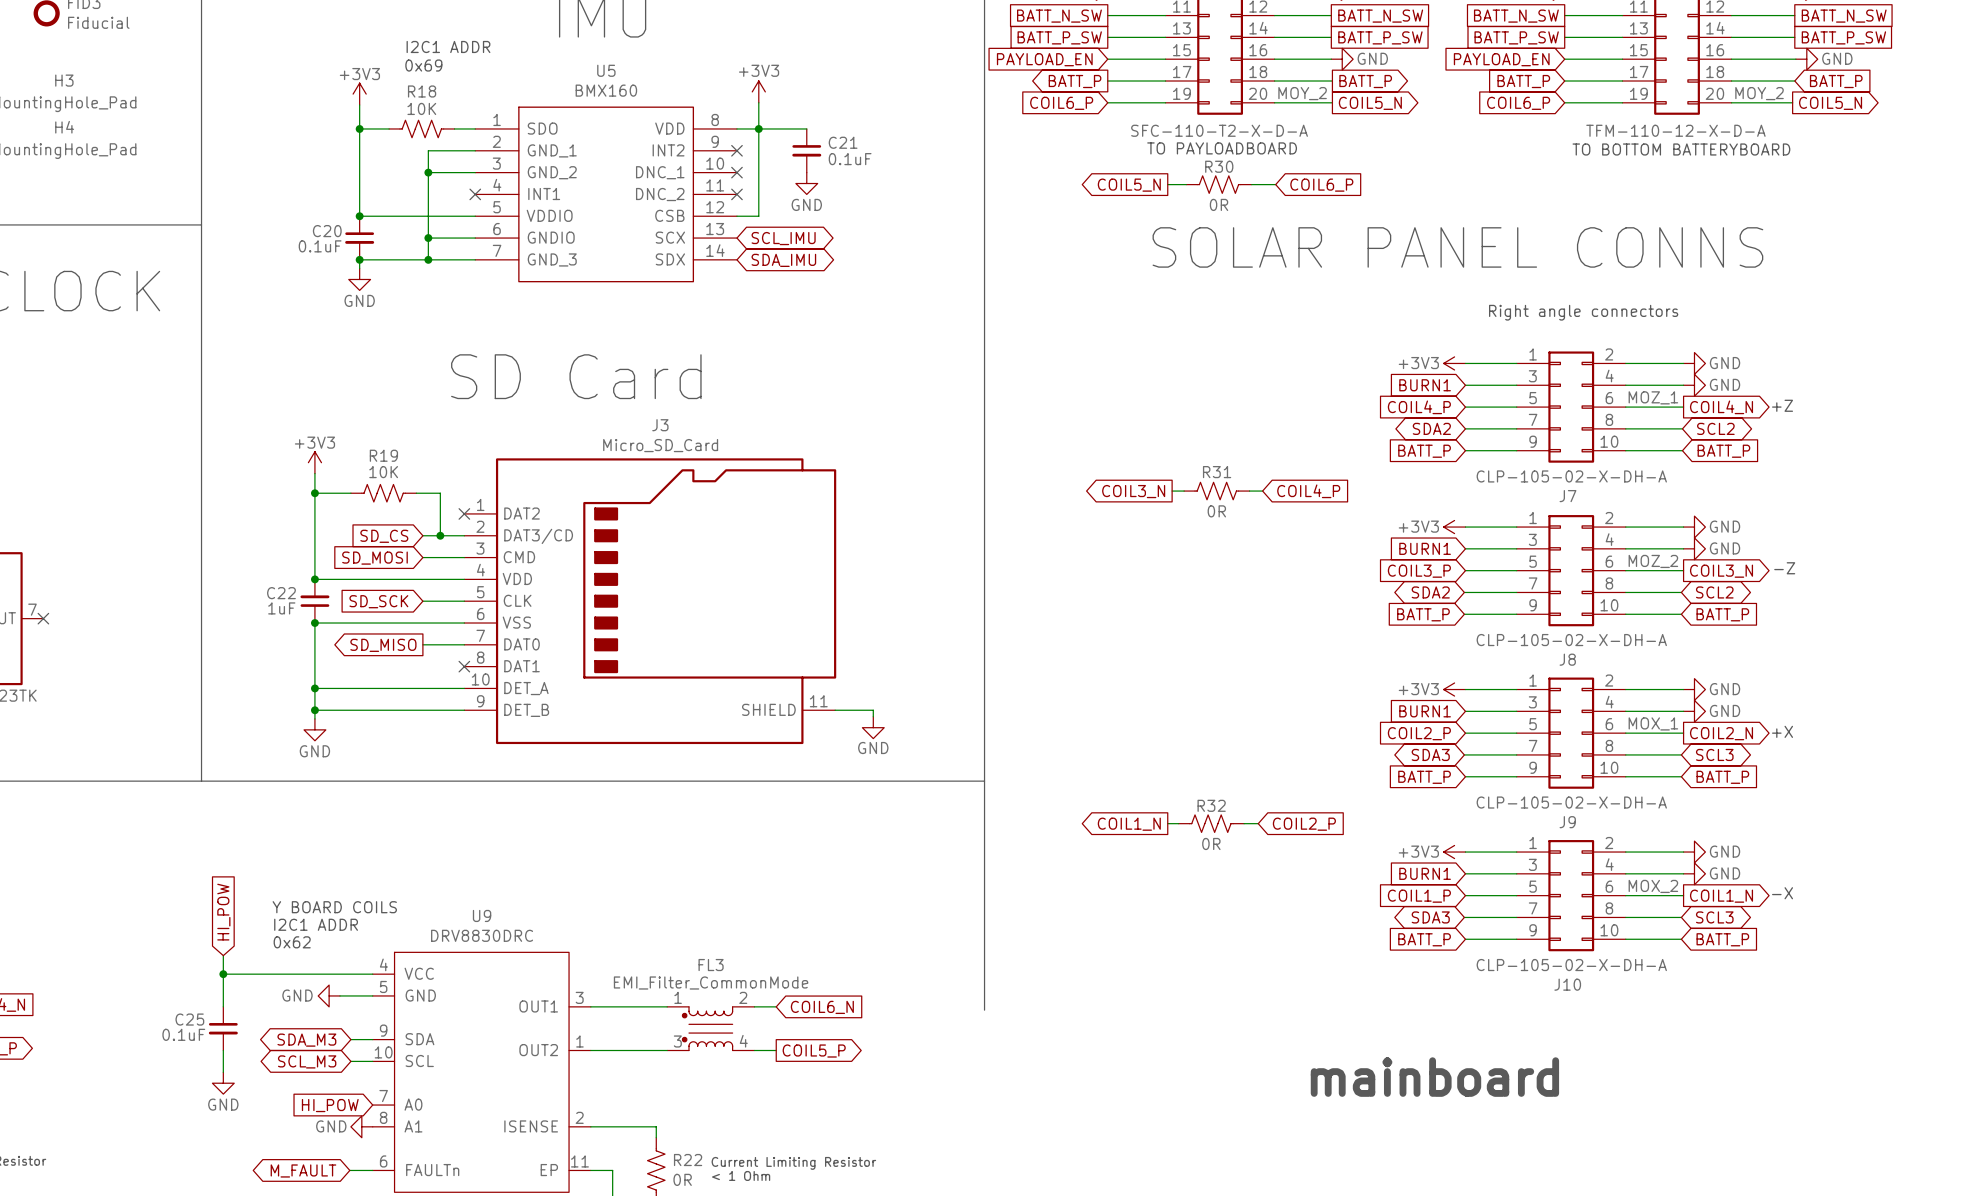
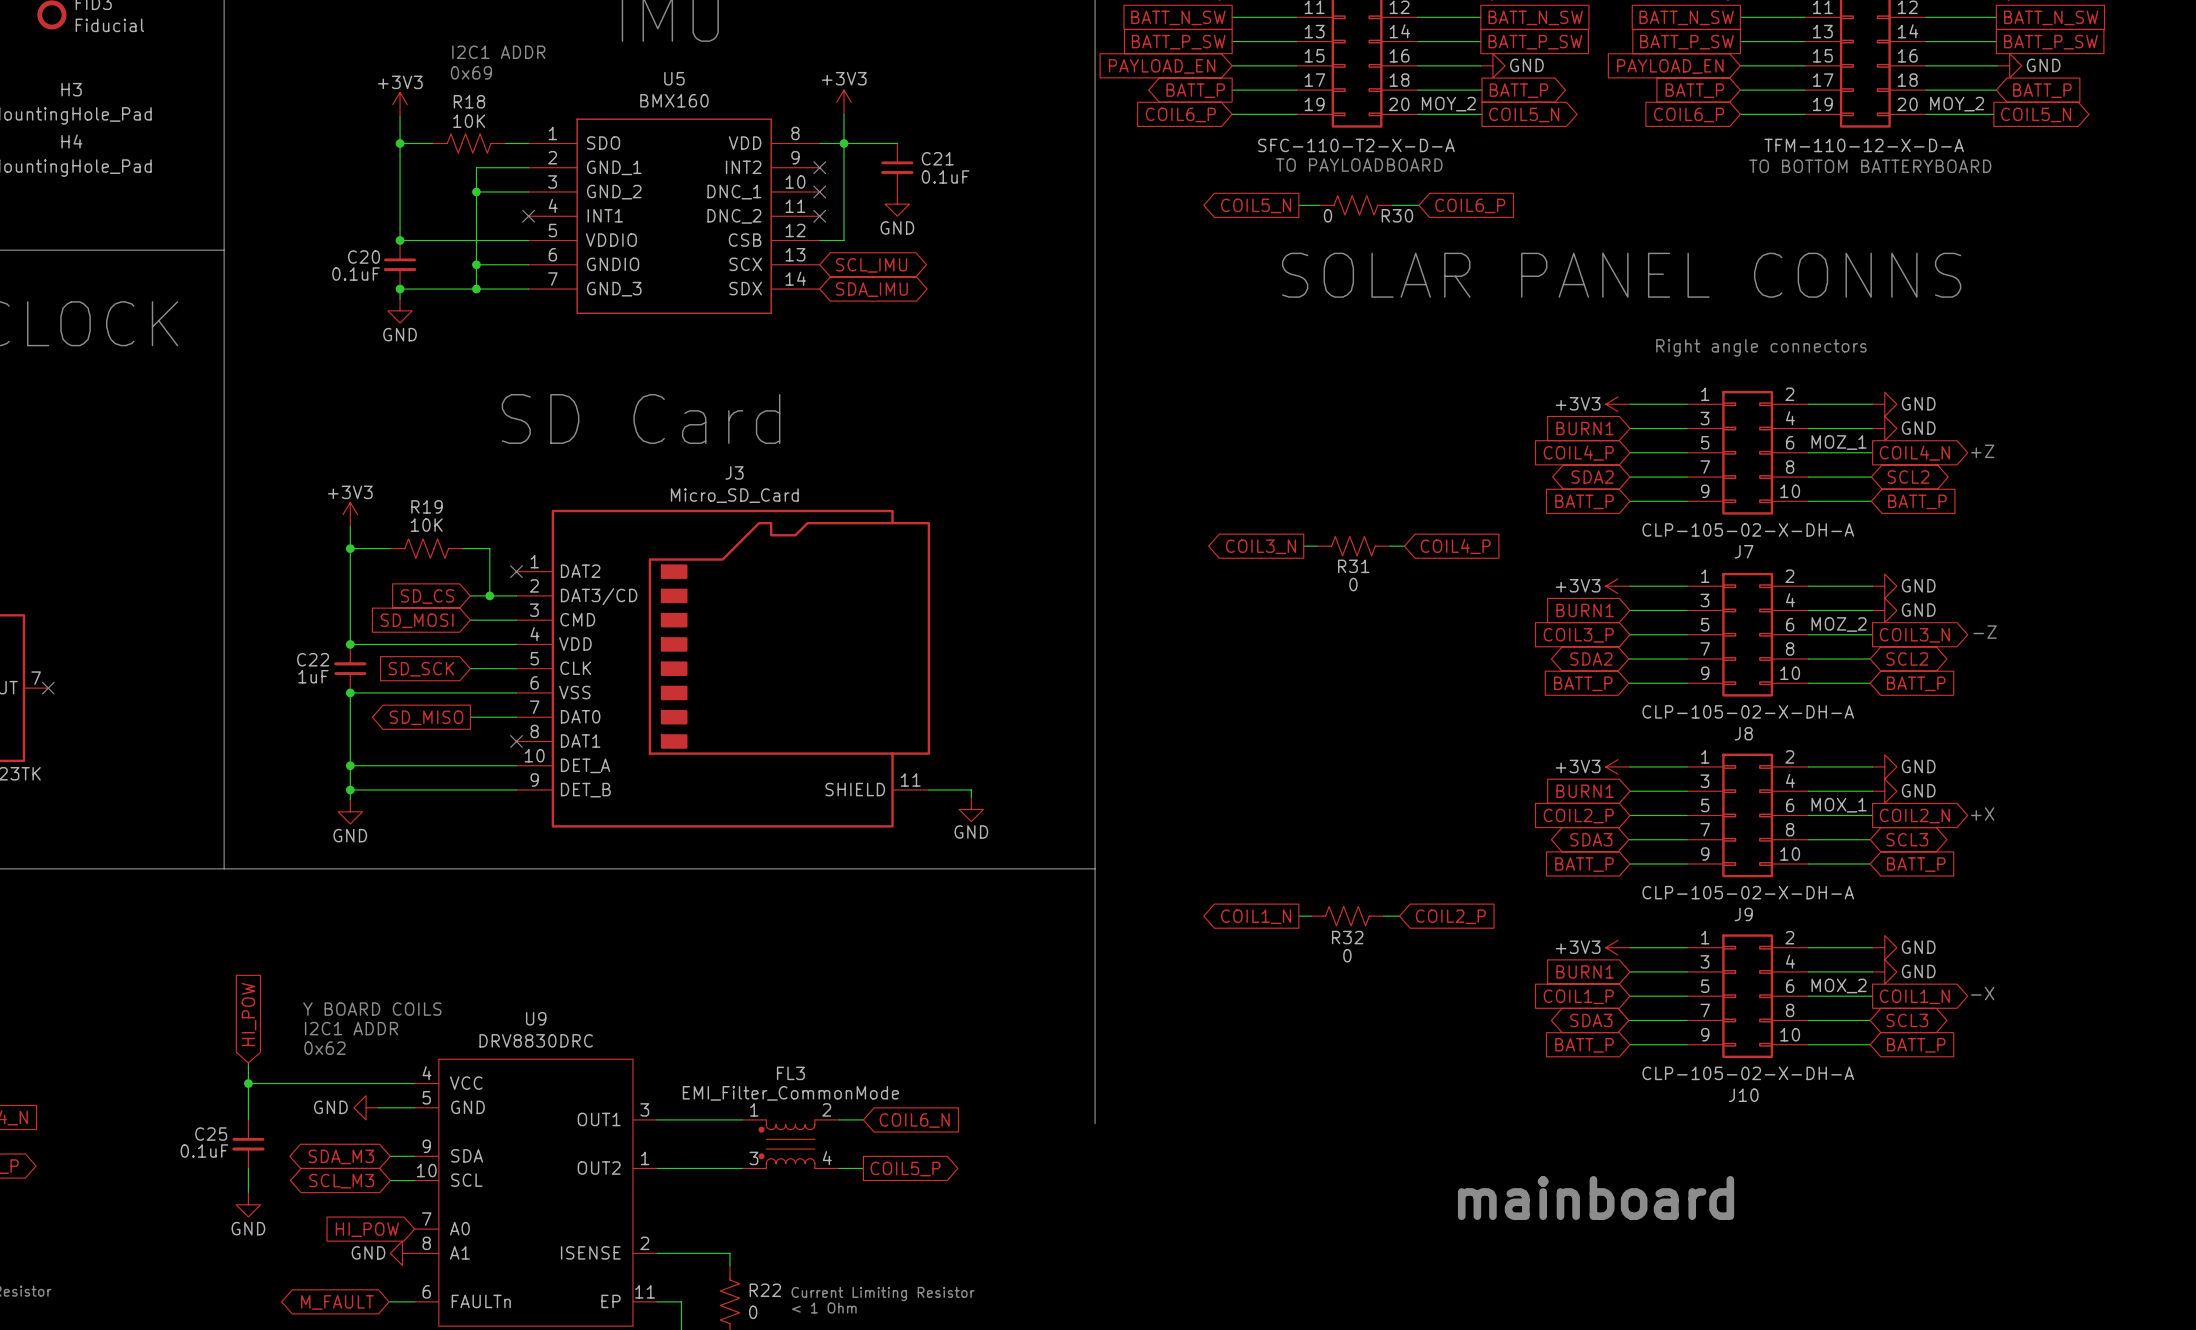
R30 name position: R30 (1219, 166) -> R30 (1397, 215)
R30 value: 0R (1219, 204) -> 0 (1327, 215)
R31 name position: R31 (1217, 472) -> R31 (1353, 566)
R31 value: 0R (1216, 511) -> 0 (1353, 584)
R32 name position: R32 (1211, 805) -> R32 (1347, 937)
R32 value: 0R (1211, 843) -> 0 (1347, 955)
R22 value: 0R (682, 1179) -> 0 (753, 1312)

